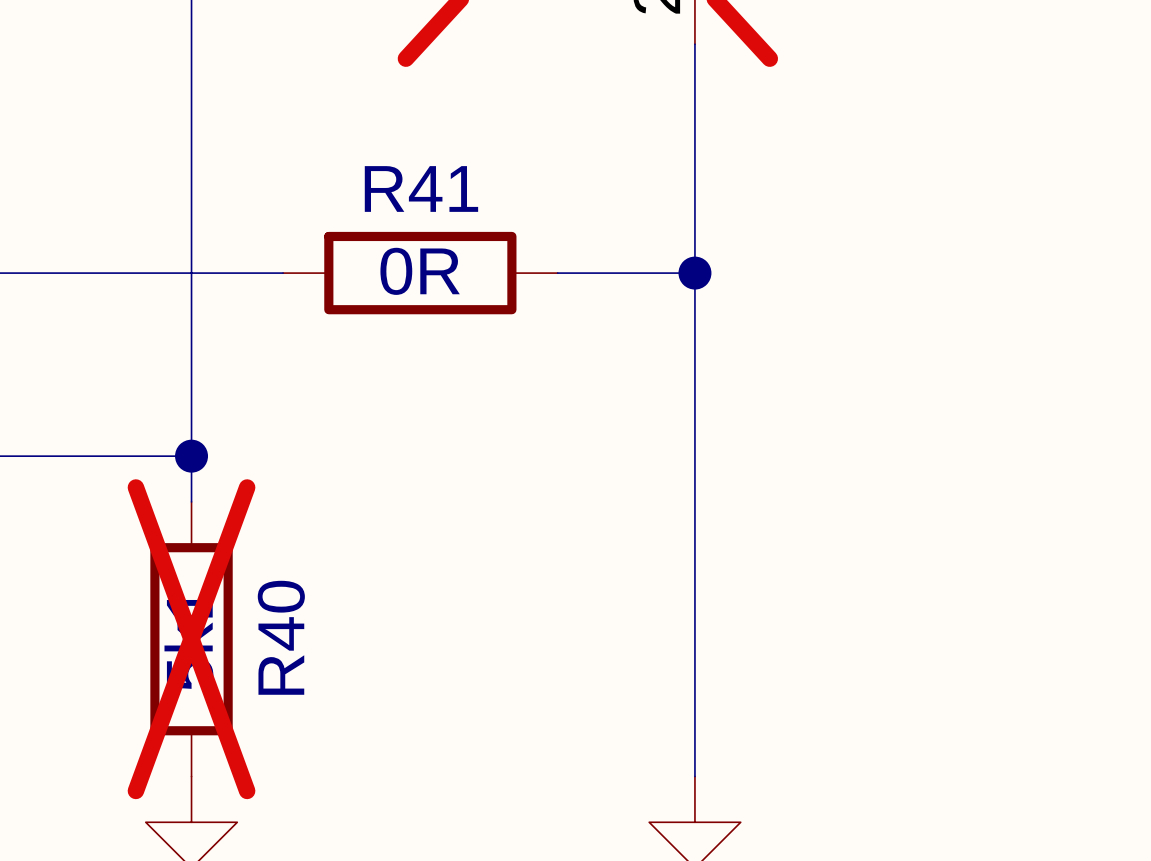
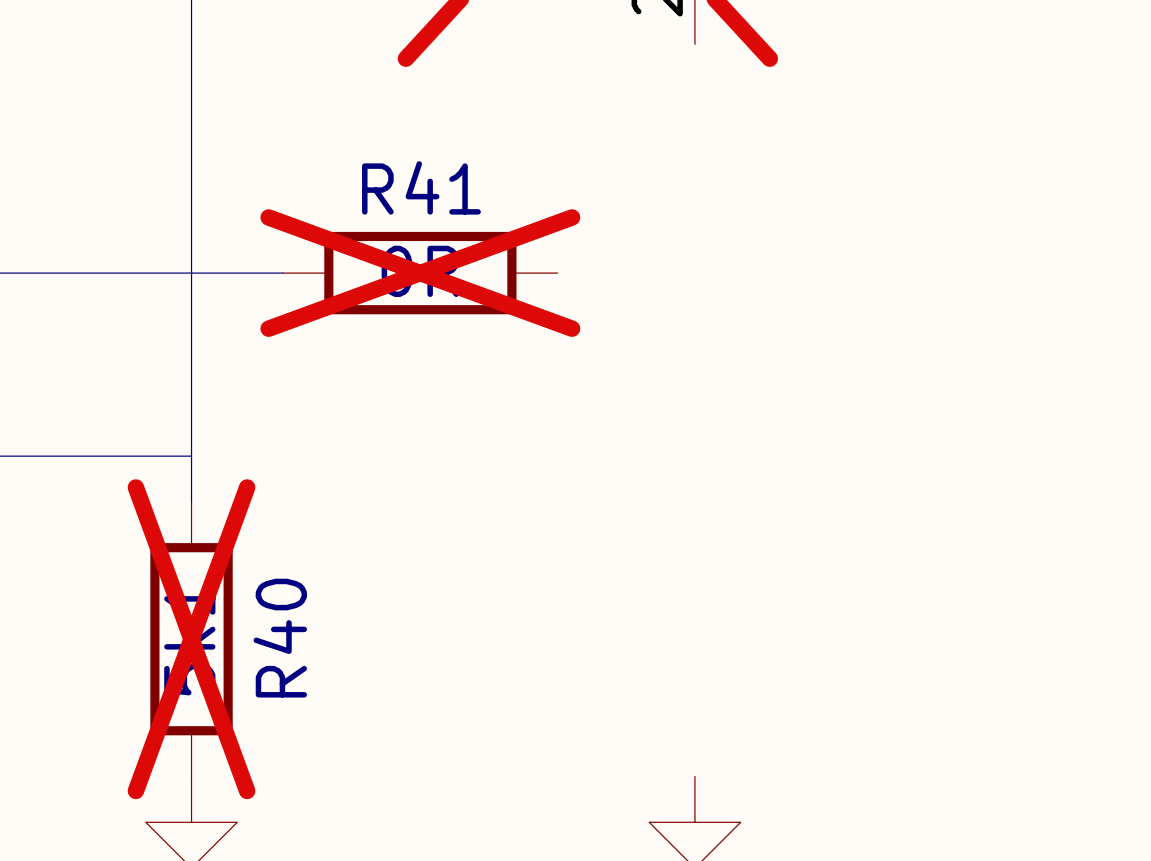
wire: (694, 44) (694, 776) -> none
R41 do-not-place cross: none -> (420, 273)
wire: (557, 273) (694, 273) -> none
junction: (694, 273) -> none
junction: (191, 456) -> none

